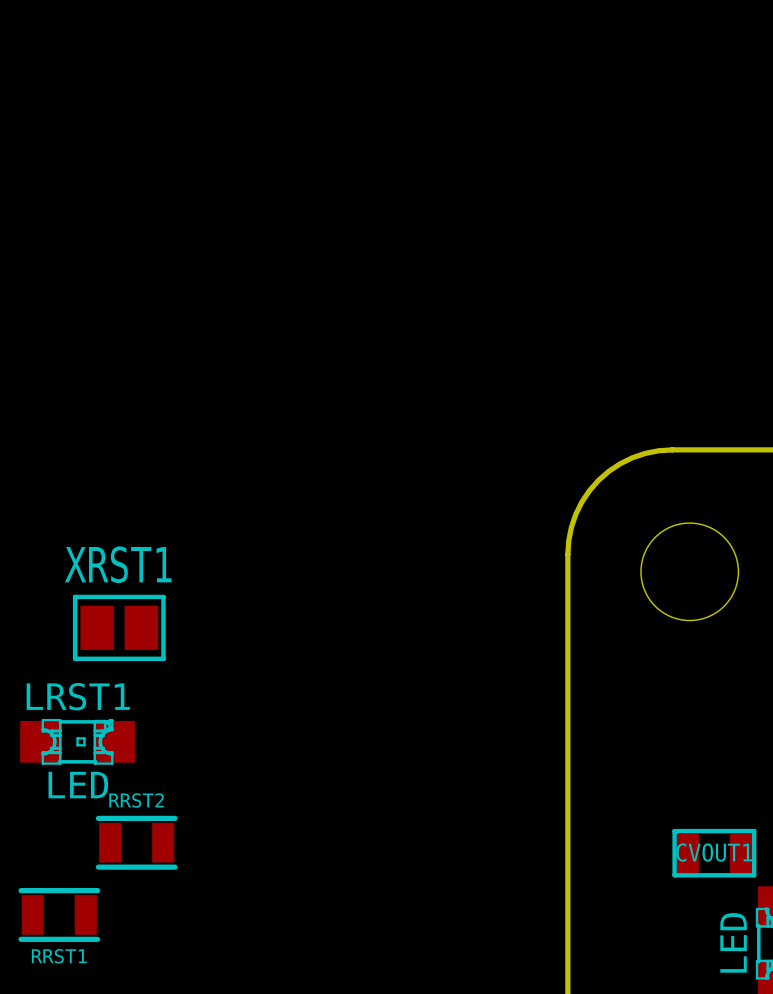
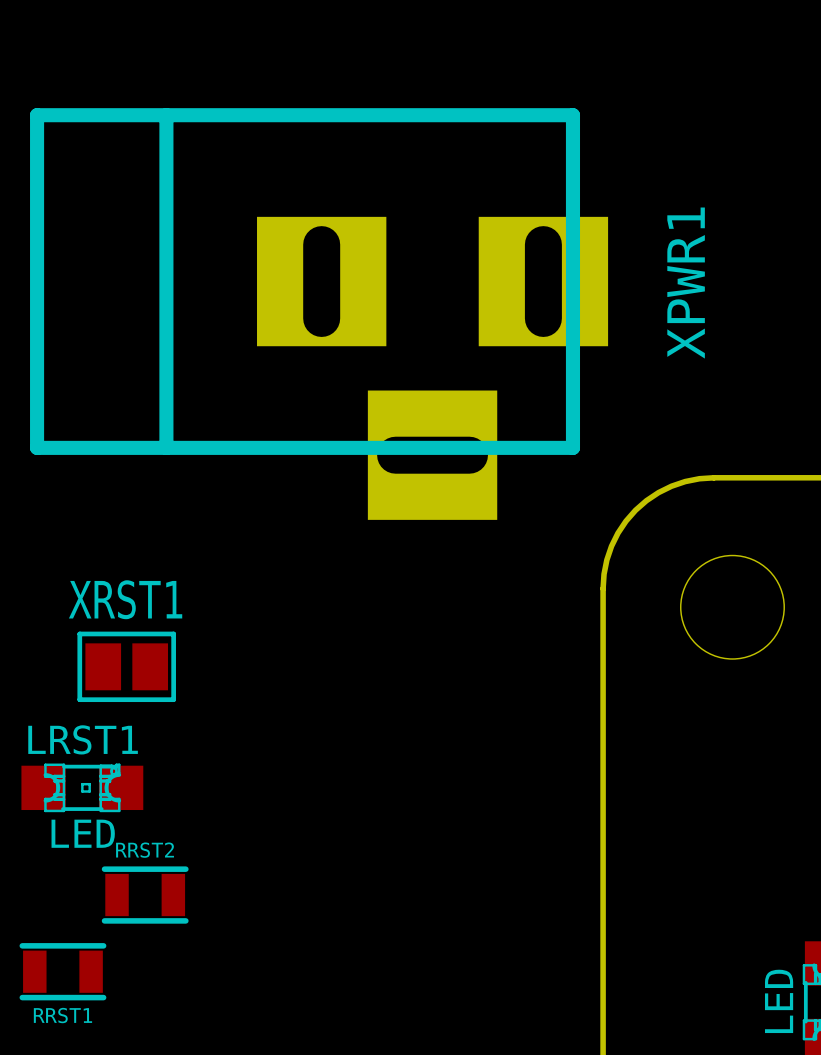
XPWR1: none -> (319, 314)
CVOUT1: (714, 853) -> none

